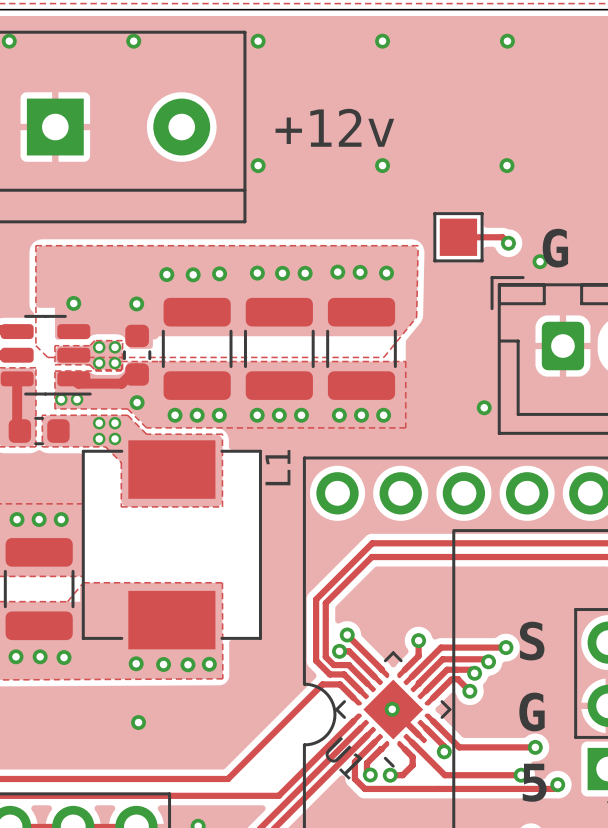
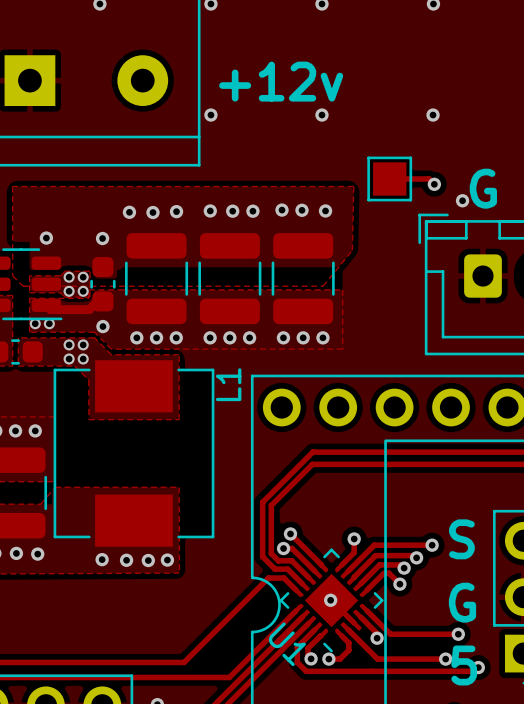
via: (484, 407) -> none
via: (138, 722) -> none

